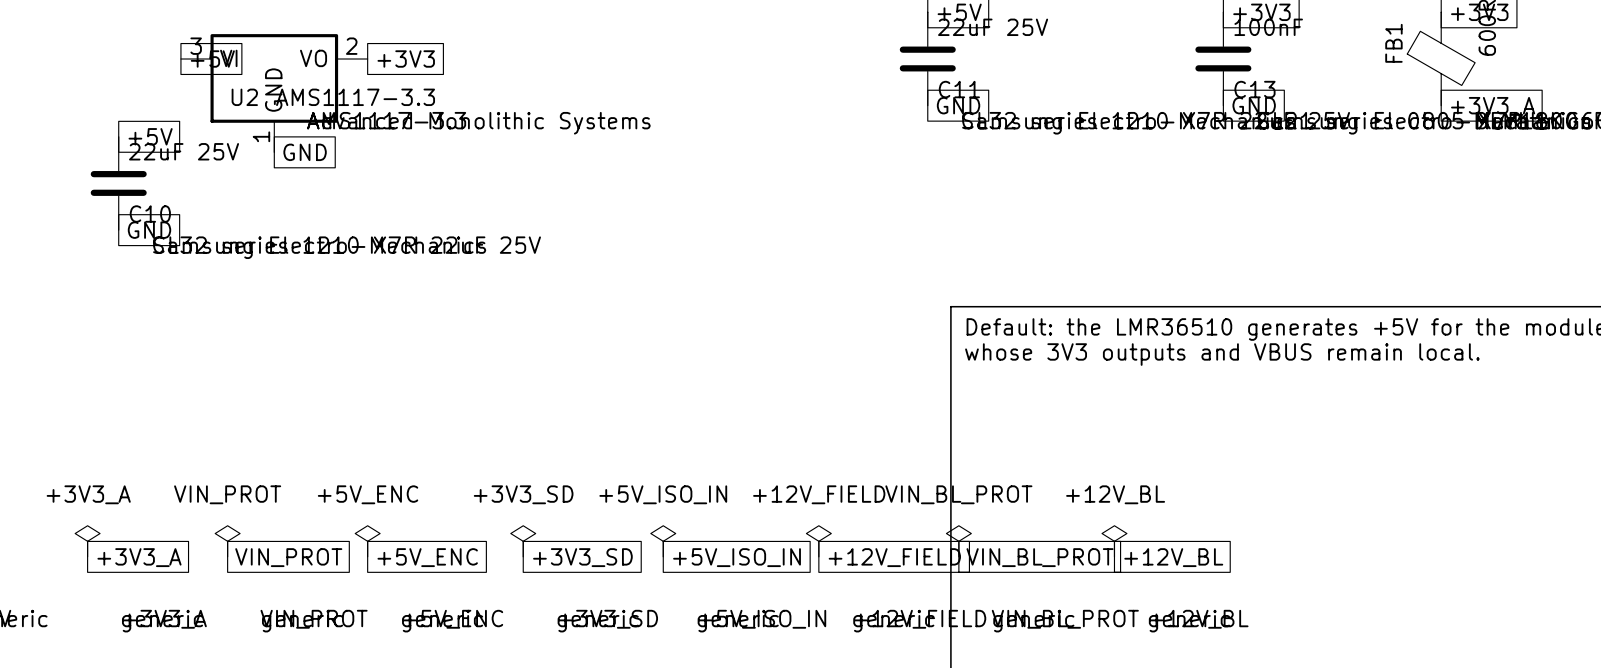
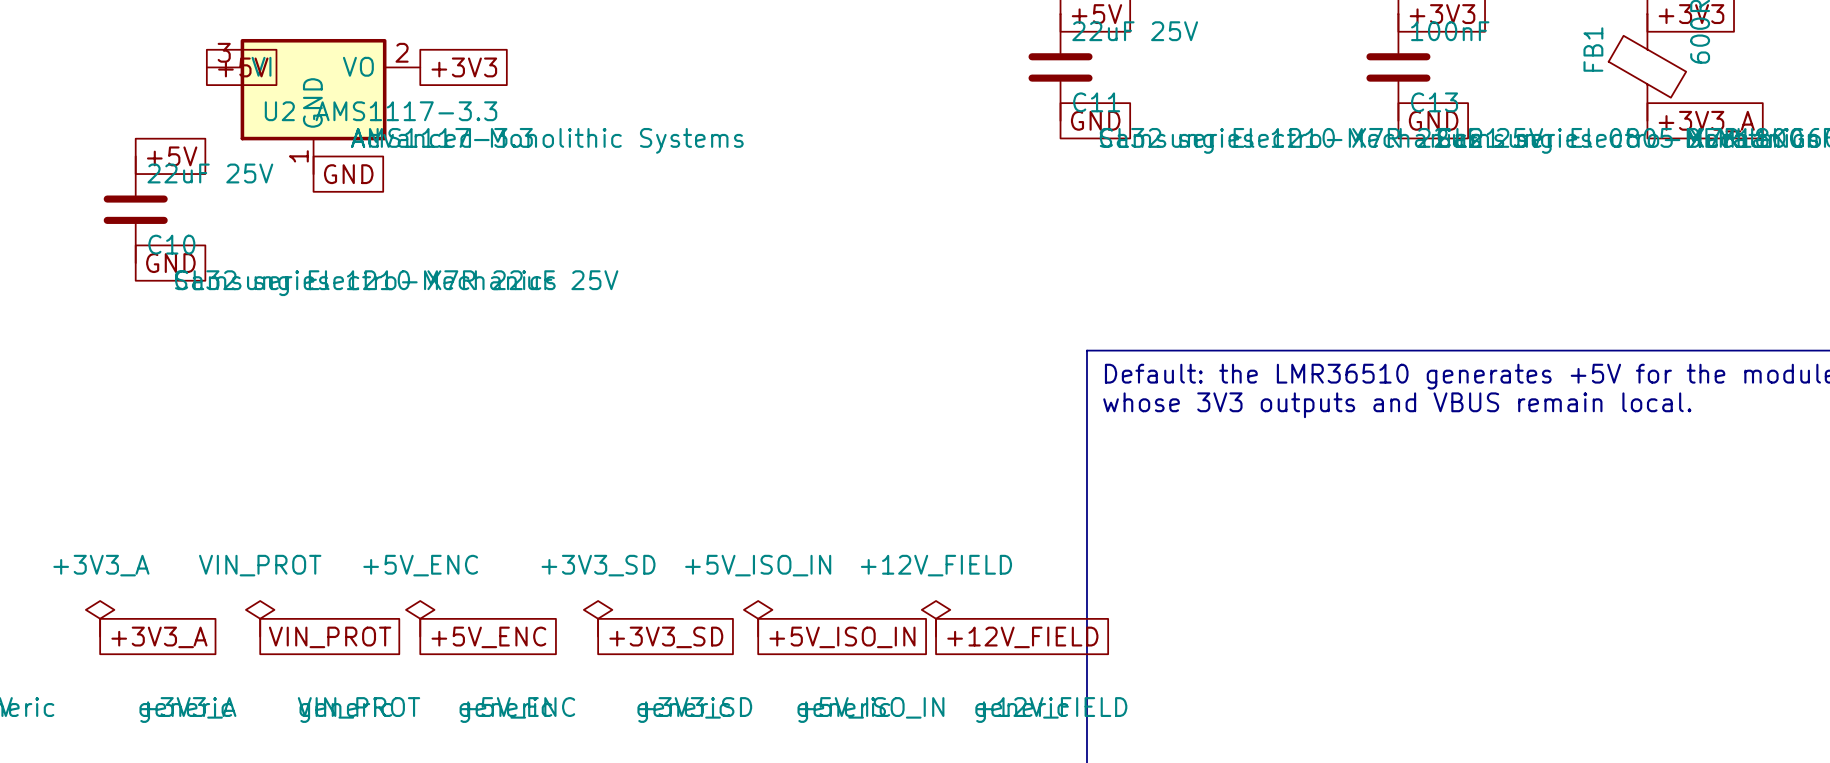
power symbol: VIN_BL_PROT (958, 541) -> none
power symbol: +12V_BL (1114, 541) -> none
global label: VIN_BL_PROT (1040, 557) -> none
global label: +12V_BL (1173, 557) -> none

